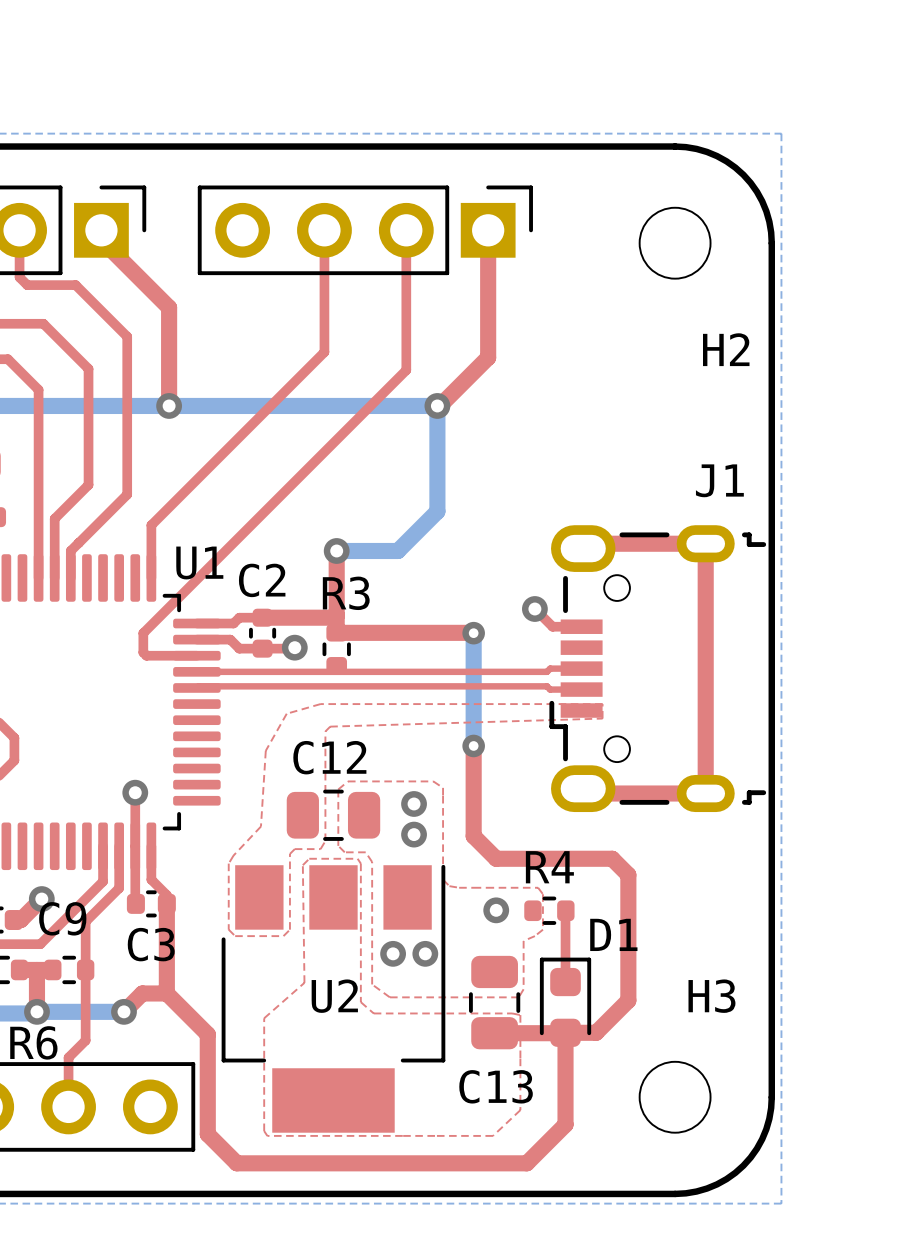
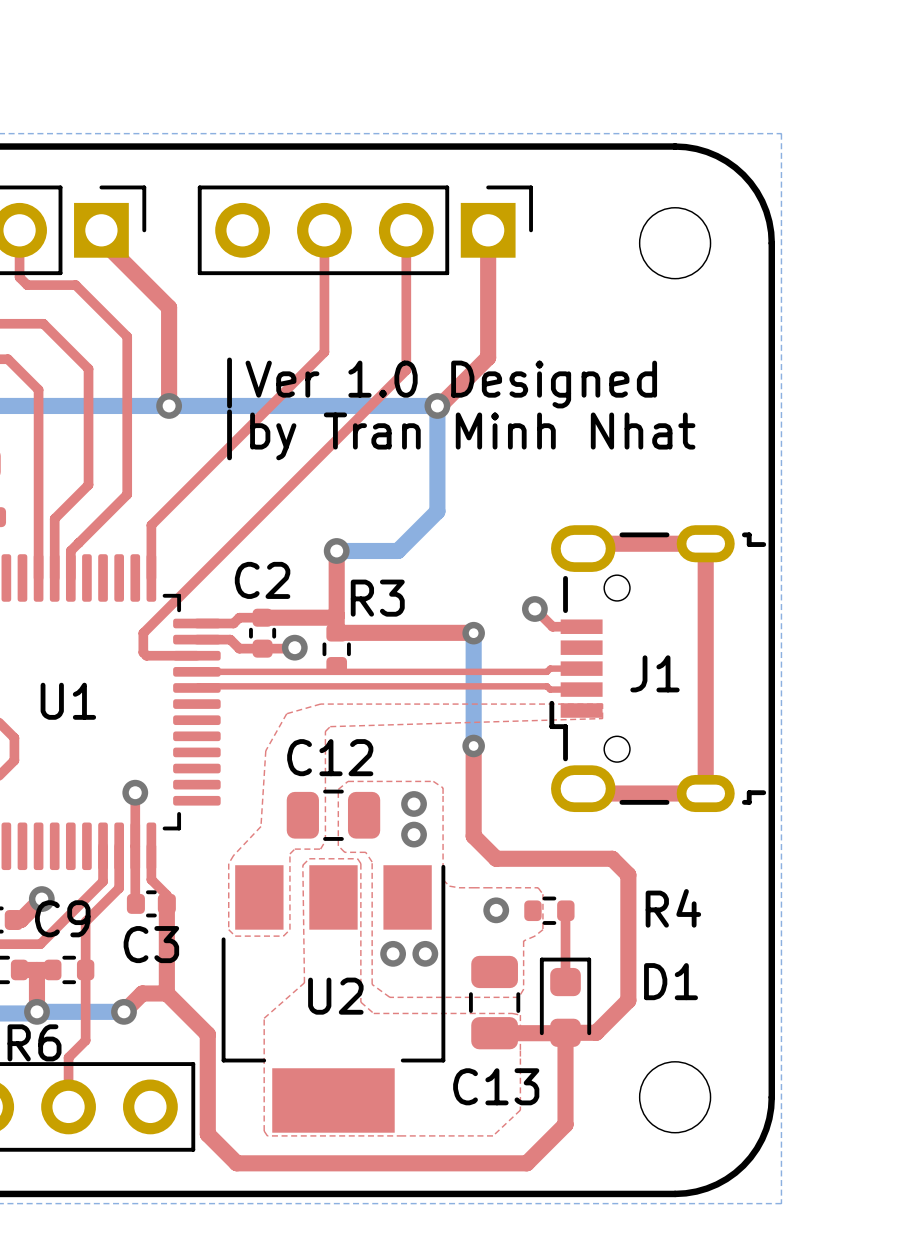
H2 name: H2 (726, 349) -> none
text: none -> |Ver 1.0 Designed (442, 382)
text: none -> |by Tran Minh Nhat (461, 434)
J1 name position: J1 (719, 480) -> J1 (654, 673)
U1 name position: U1 (199, 562) -> U1 (68, 701)
R3 name position: R3 (346, 593) -> R3 (377, 598)
R4 name position: R4 (549, 867) -> R4 (673, 908)
D1 name position: D1 (613, 934) -> D1 (671, 981)
H3 name: H3 (711, 996) -> none

